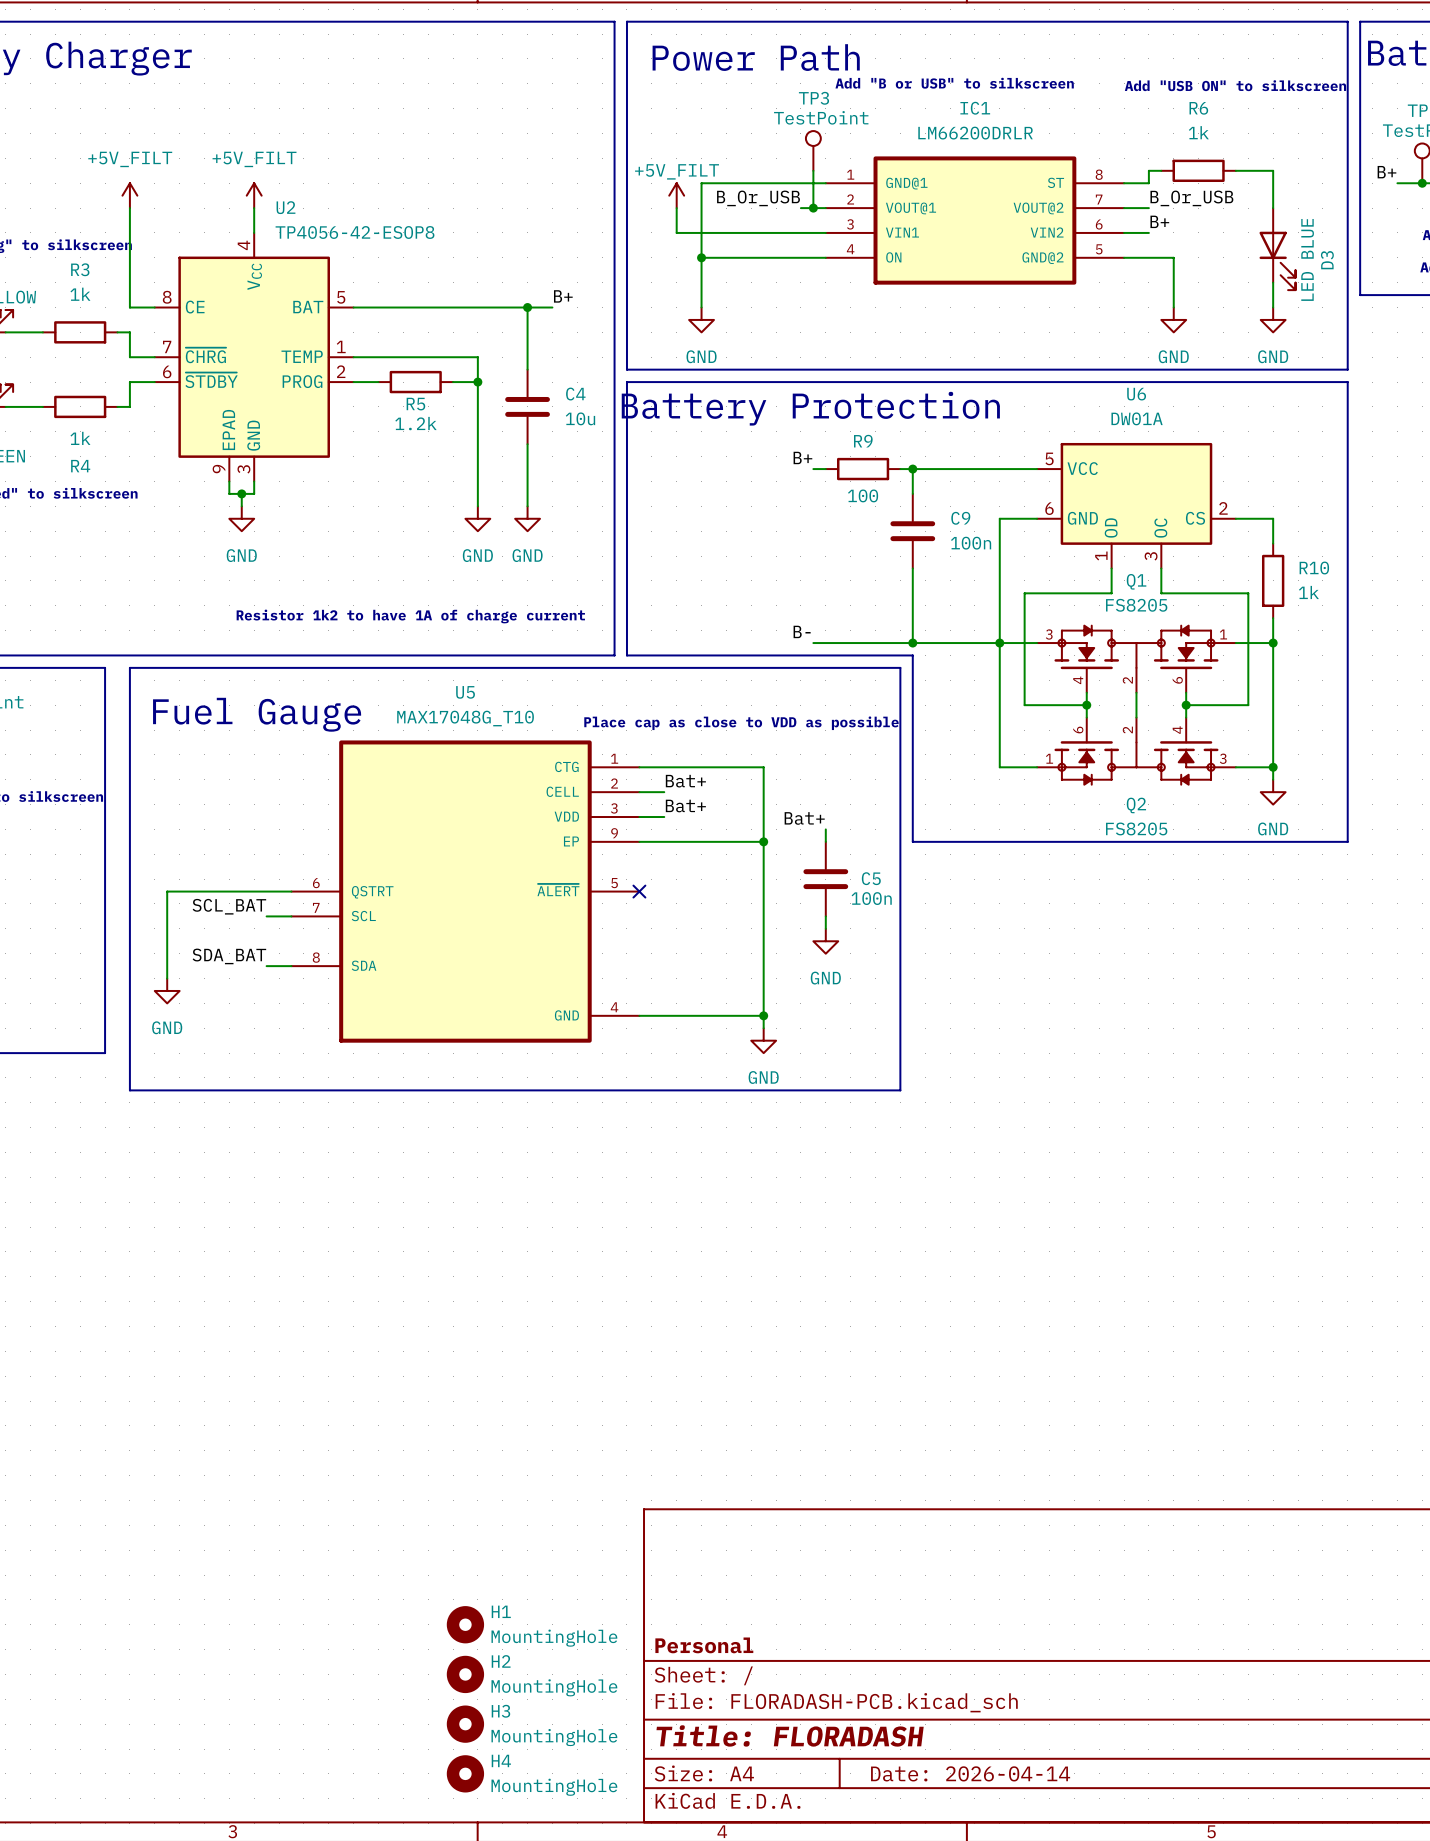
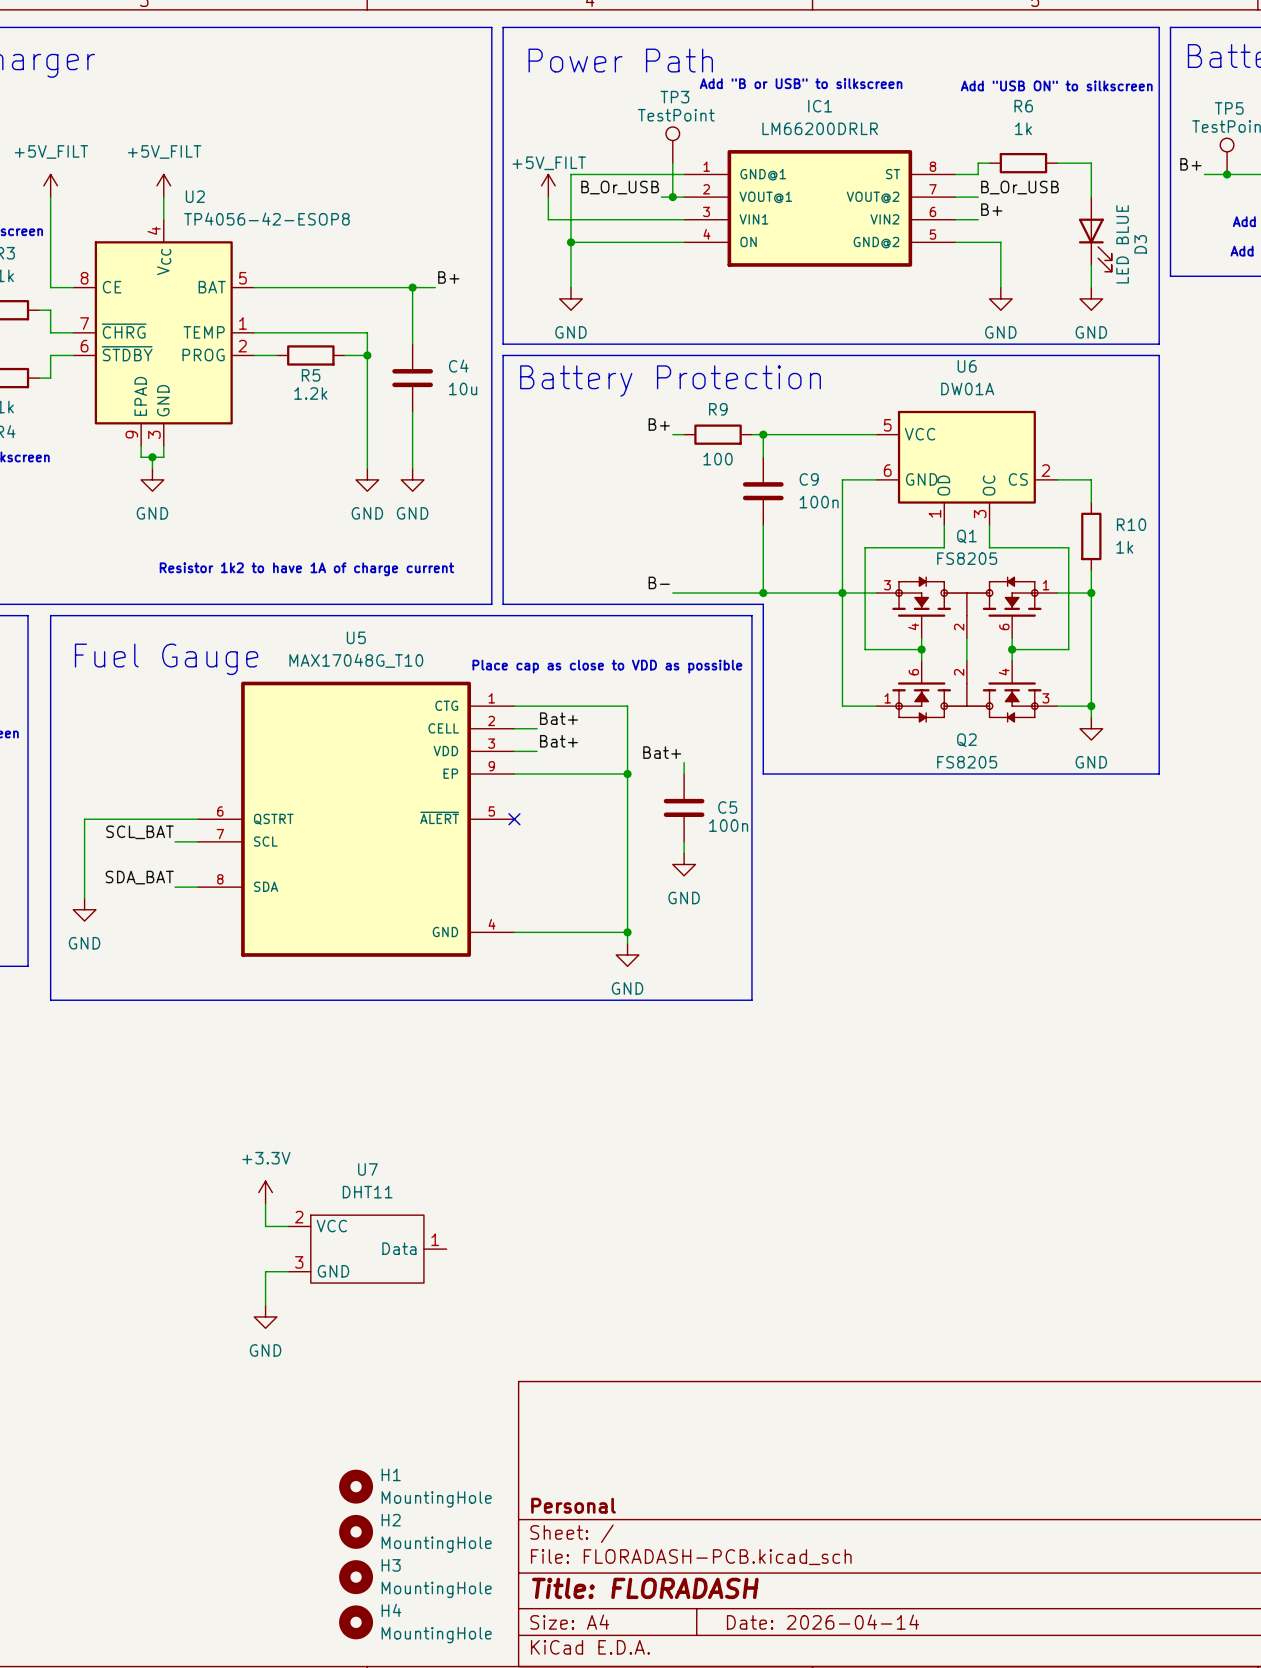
power symbol: none -> +3.3V (265, 1192)
wire: none -> (265, 1203) (265, 1226) (288, 1226)
U7: none -> DHT11 (367, 1249)
wire: none -> (288, 1271) (265, 1271) (265, 1305)
power symbol: none -> GND (265, 1316)

